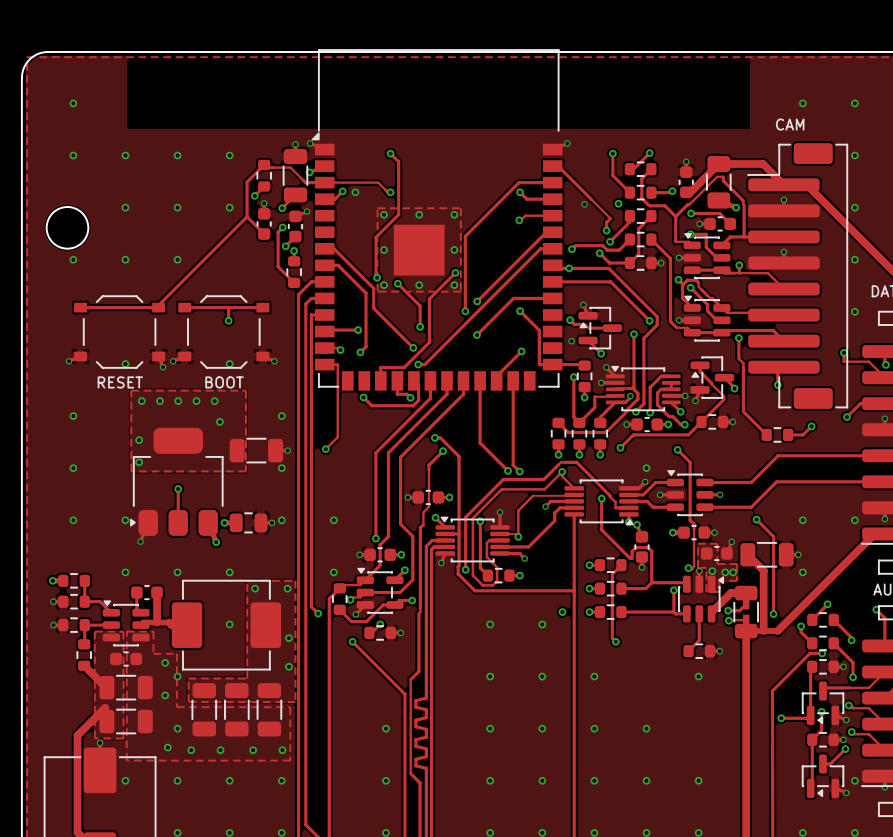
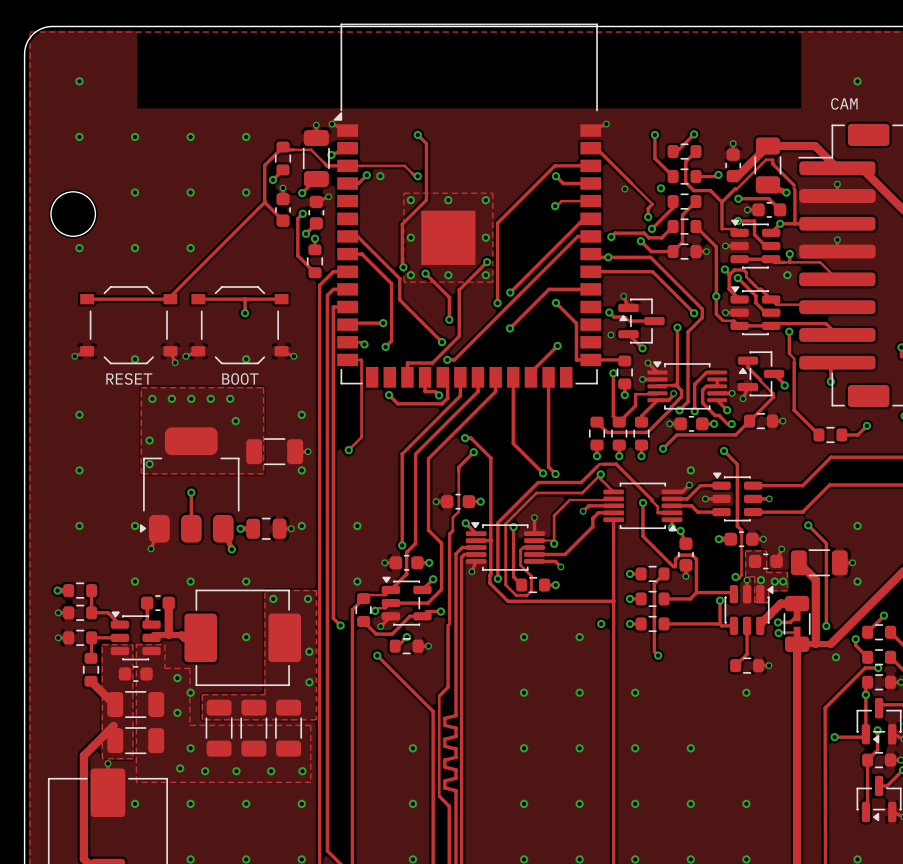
via: none -> (780, 223)
via: none -> (787, 275)
via: none -> (716, 296)
via: none -> (835, 657)
via: none -> (865, 694)

